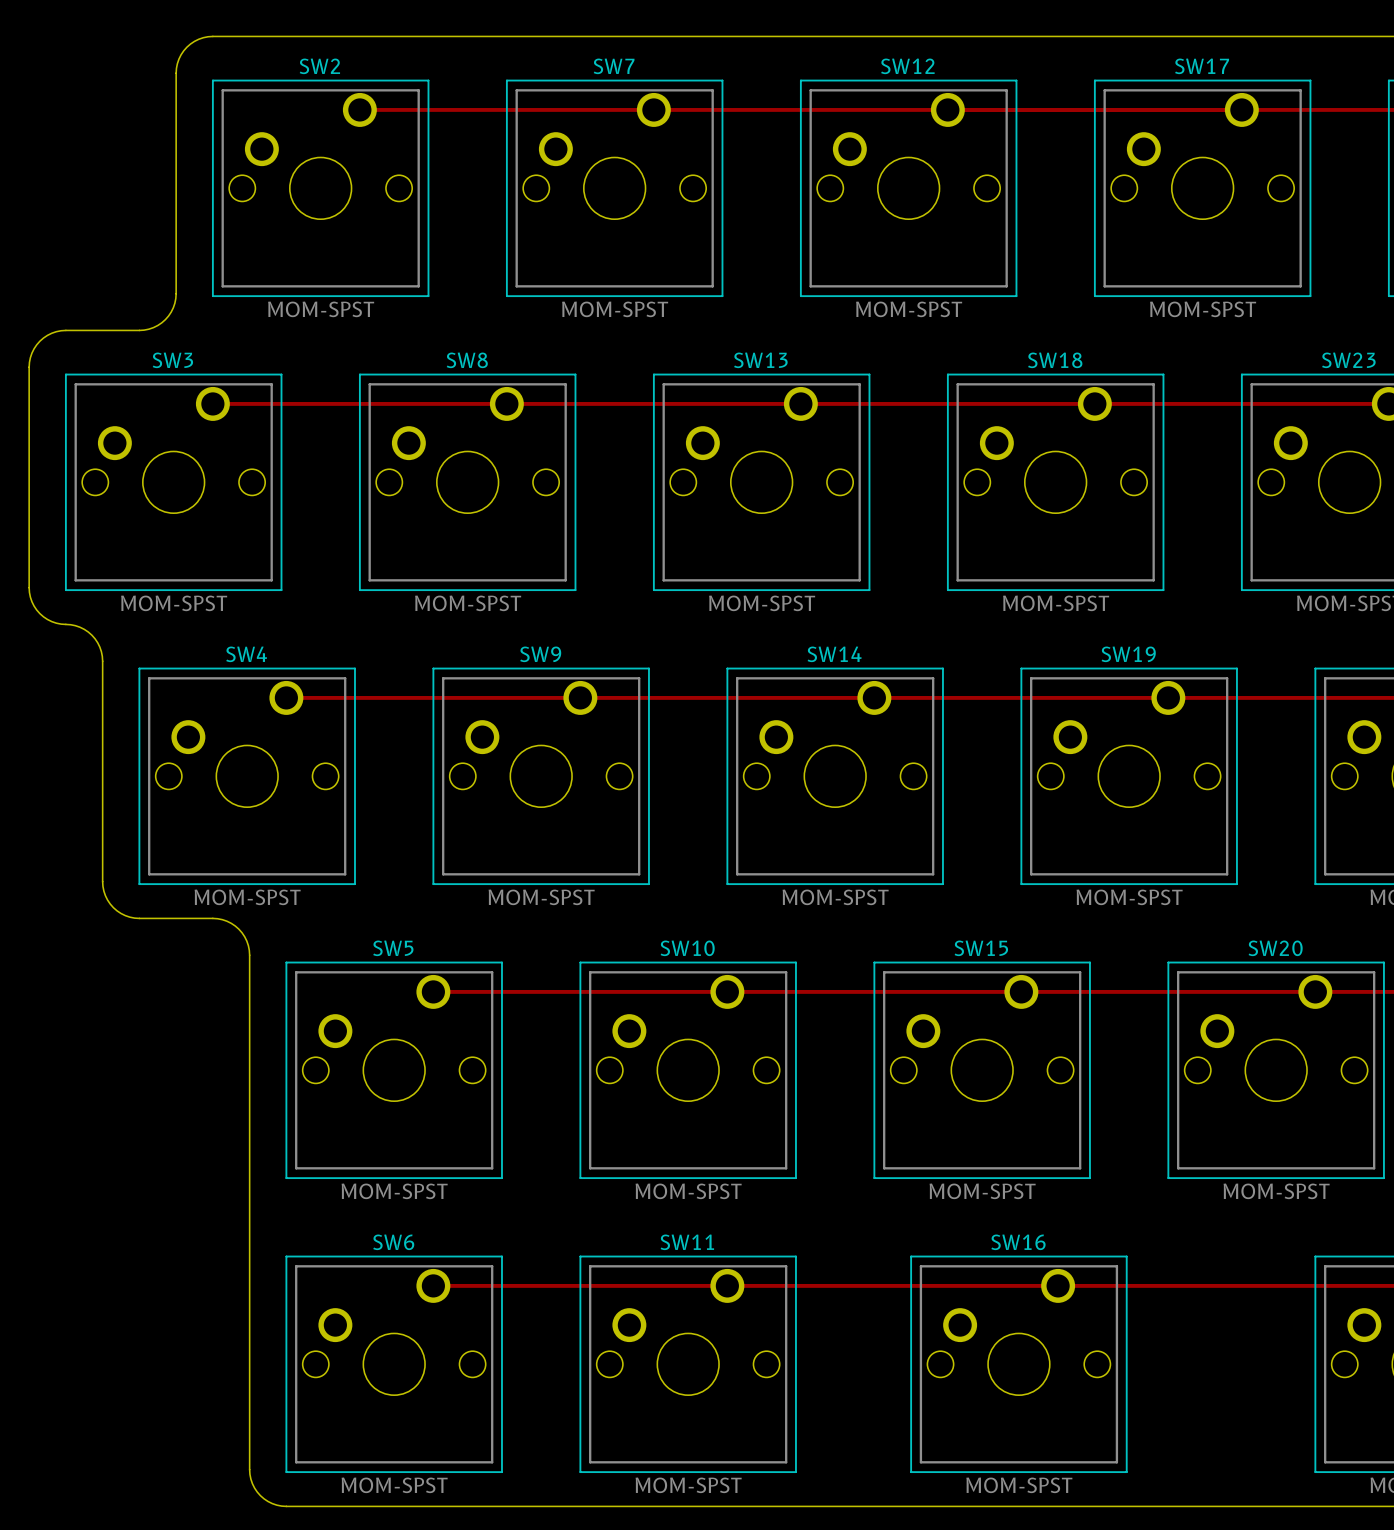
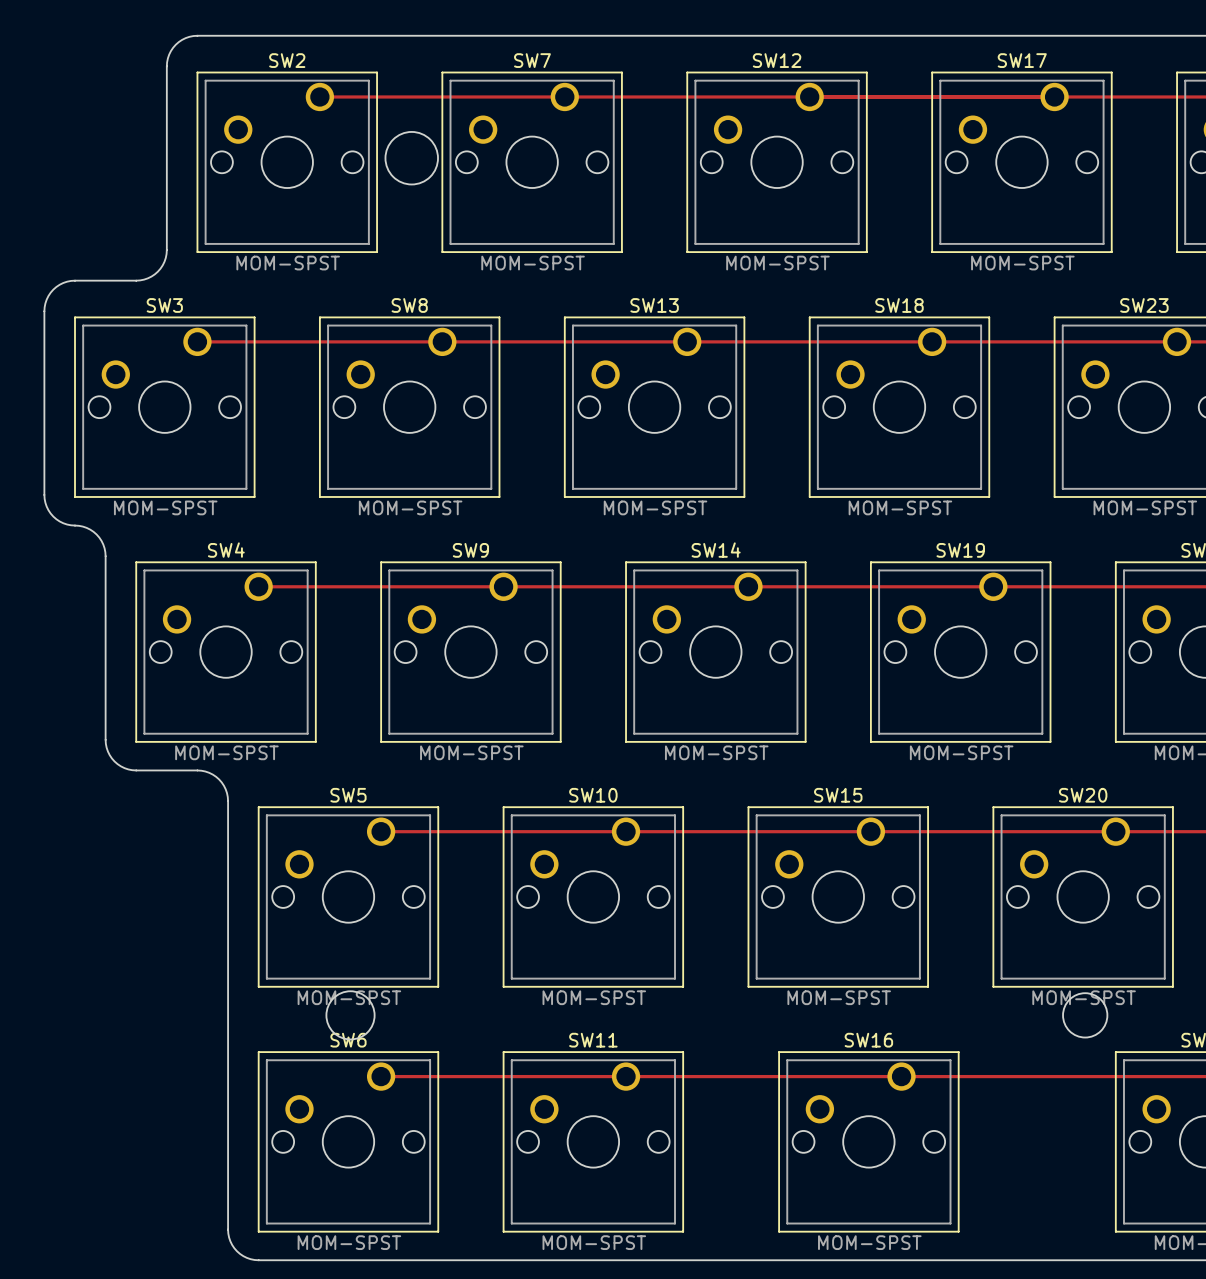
round board edge: none -> [384, 131, 439, 186]
round board edge: none -> [325, 990, 376, 1041]
round board edge: none -> [1062, 992, 1109, 1039]

